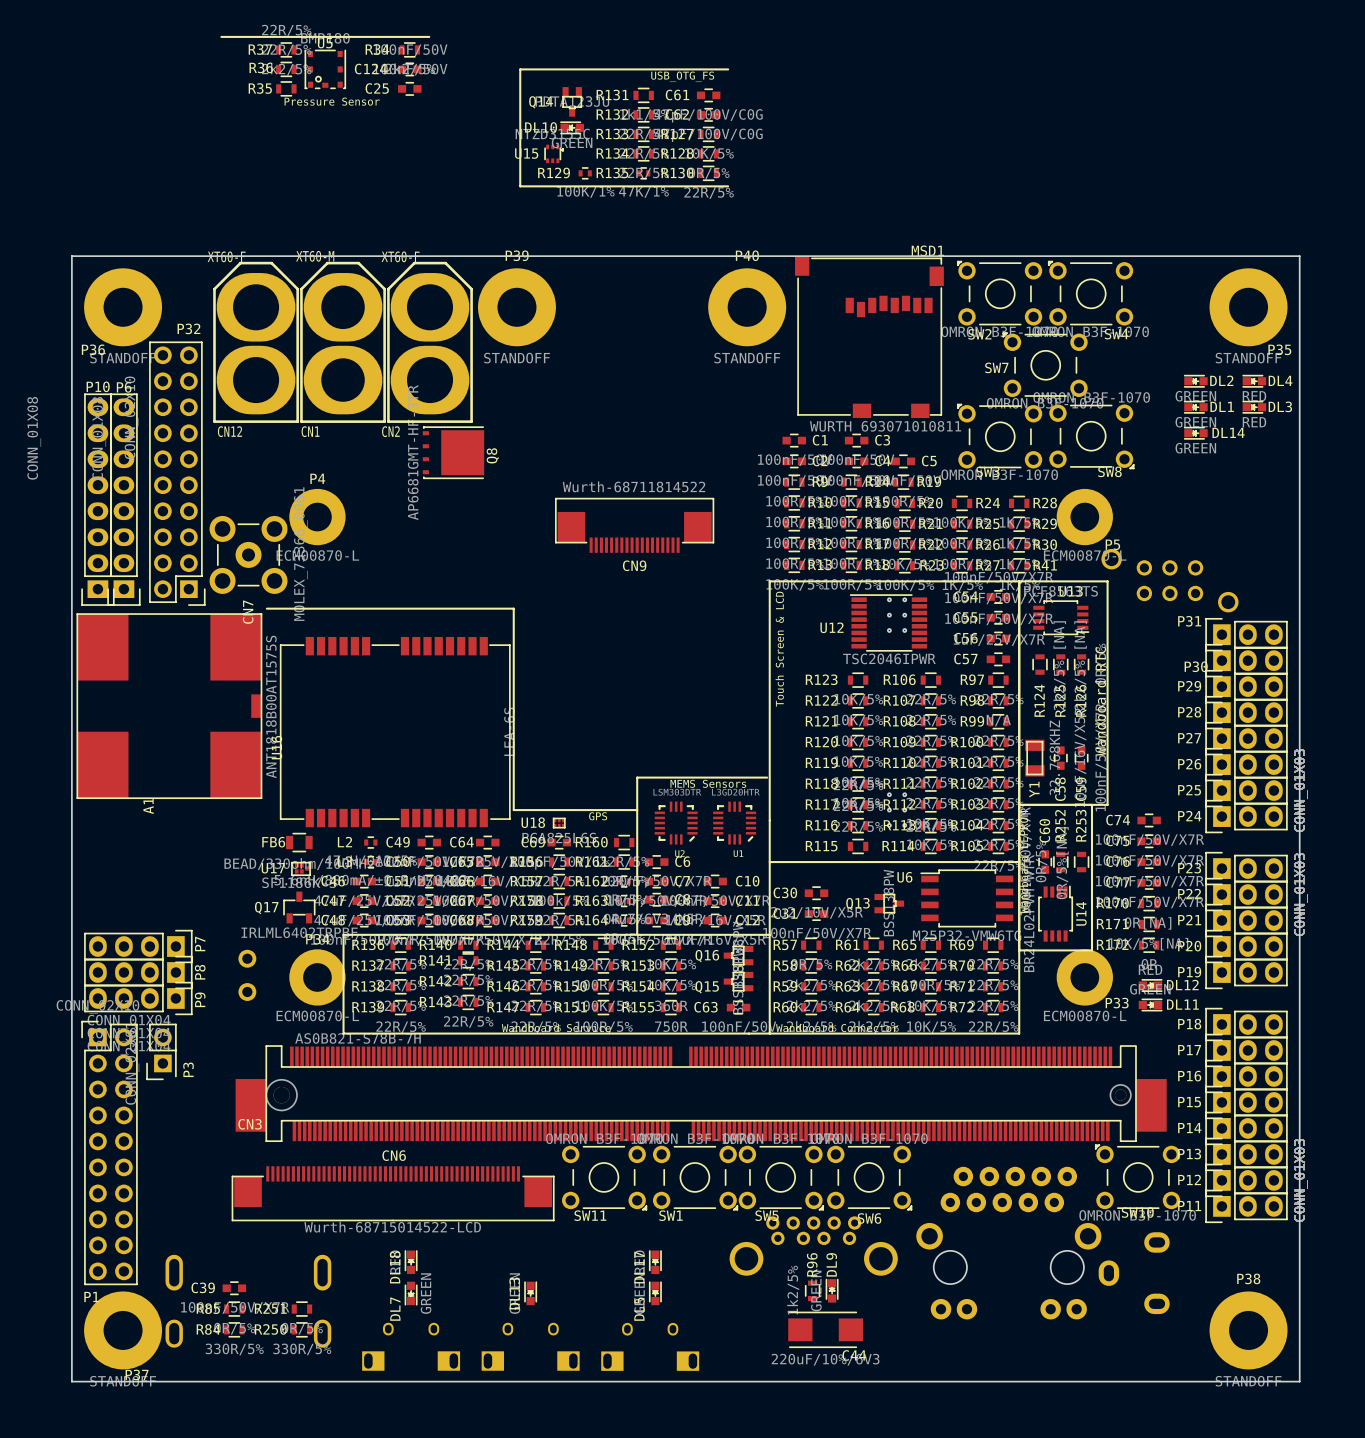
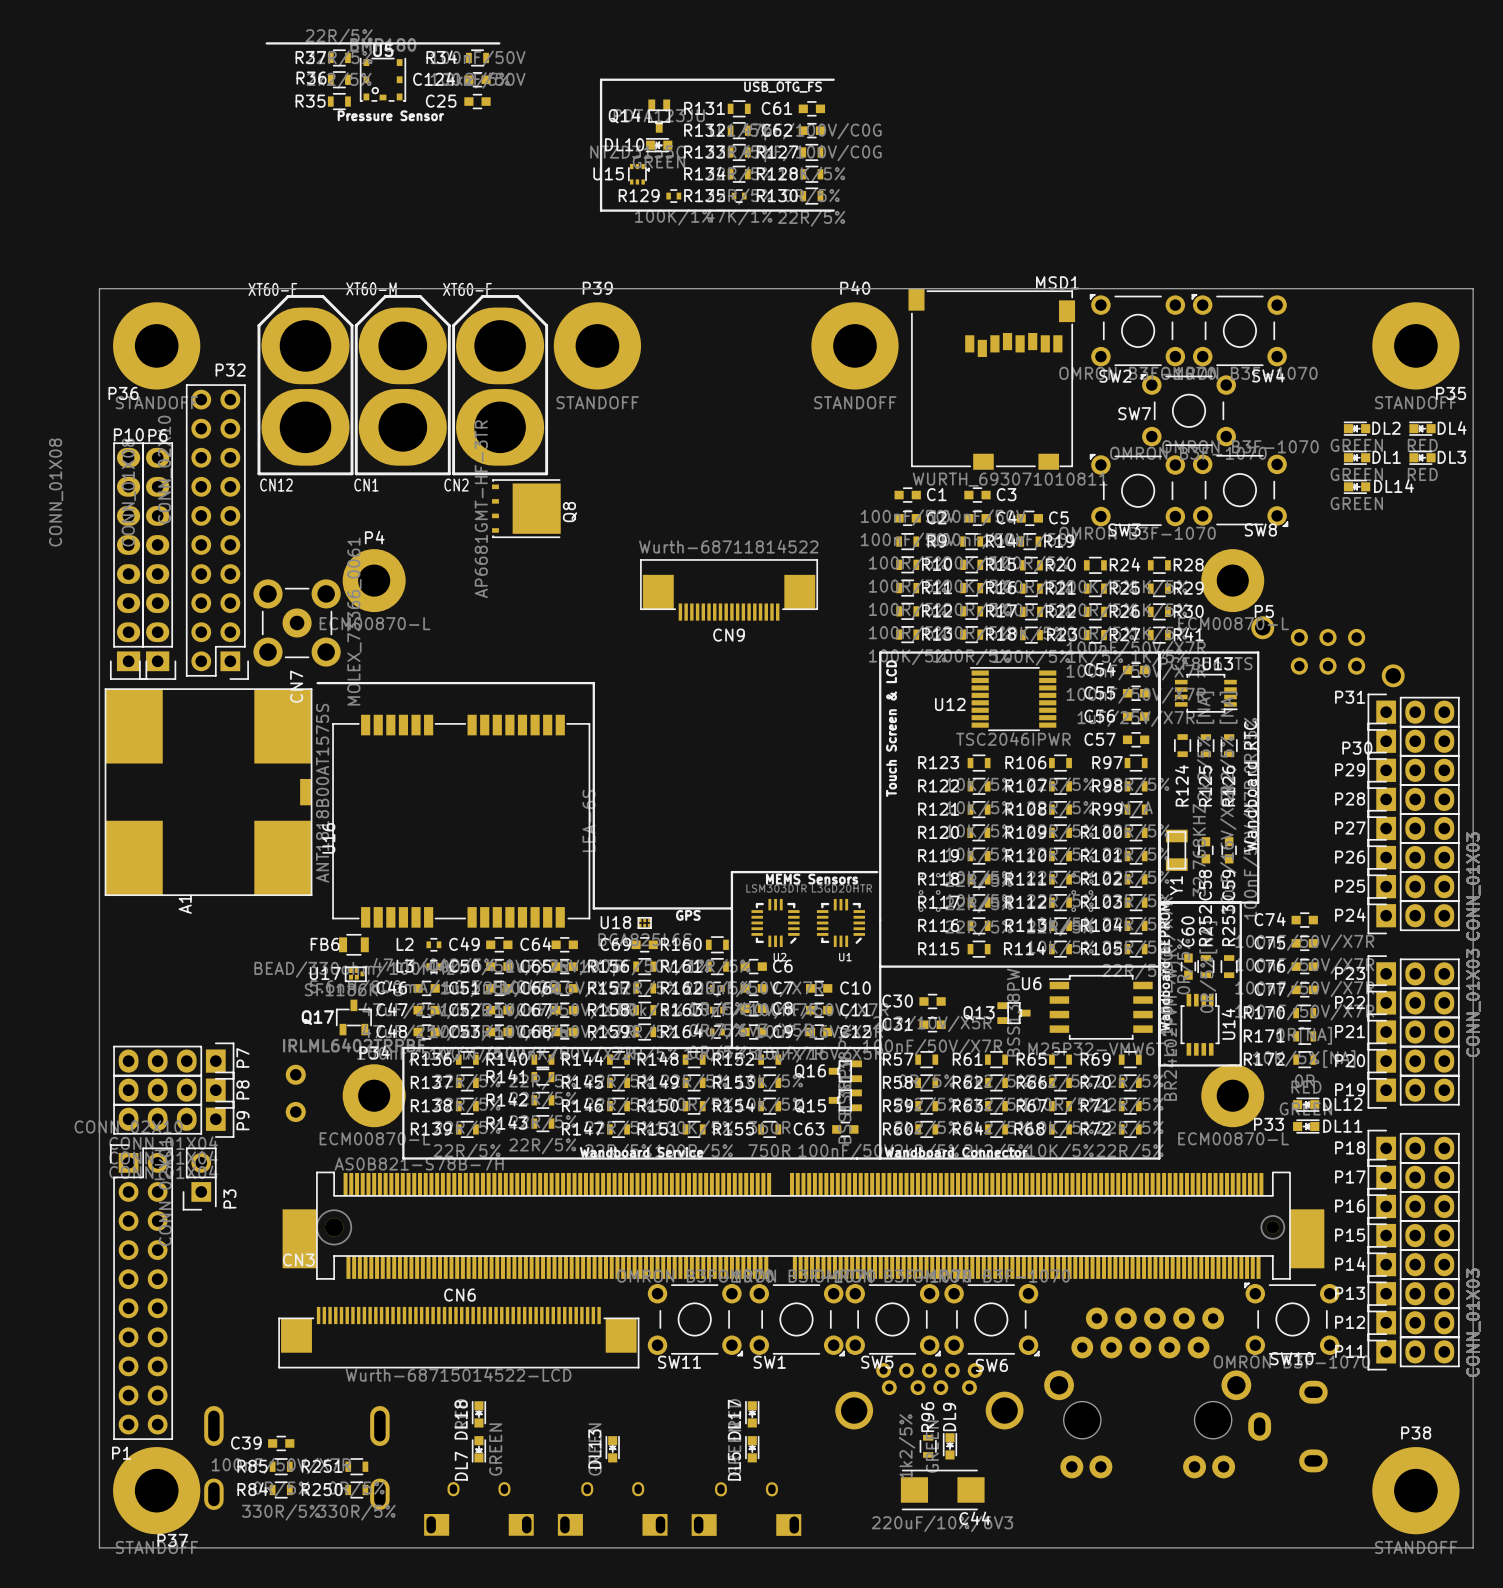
part: (897, 615) -> none
part: none -> (929, 892)
part: none -> (1082, 892)
part: (897, 810) -> none

